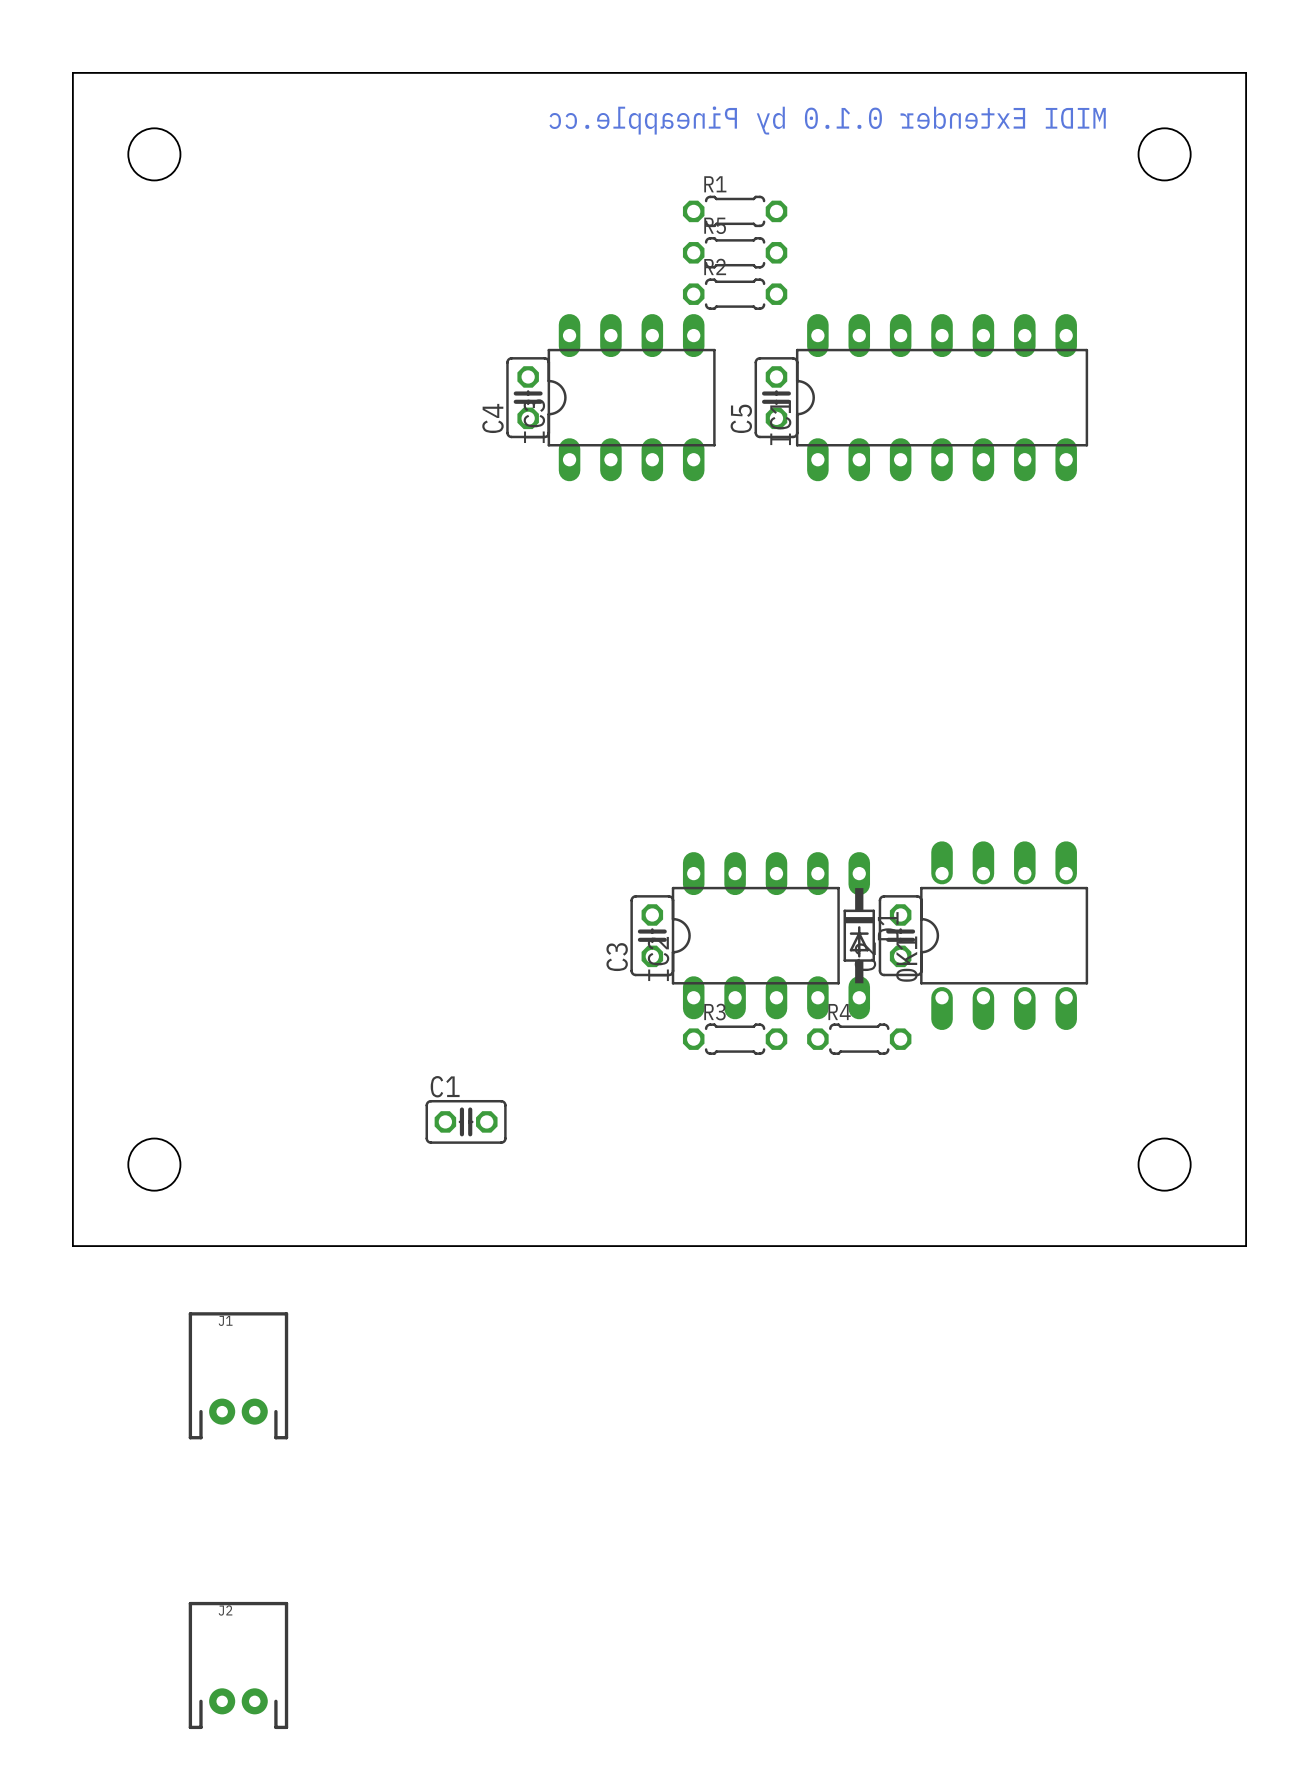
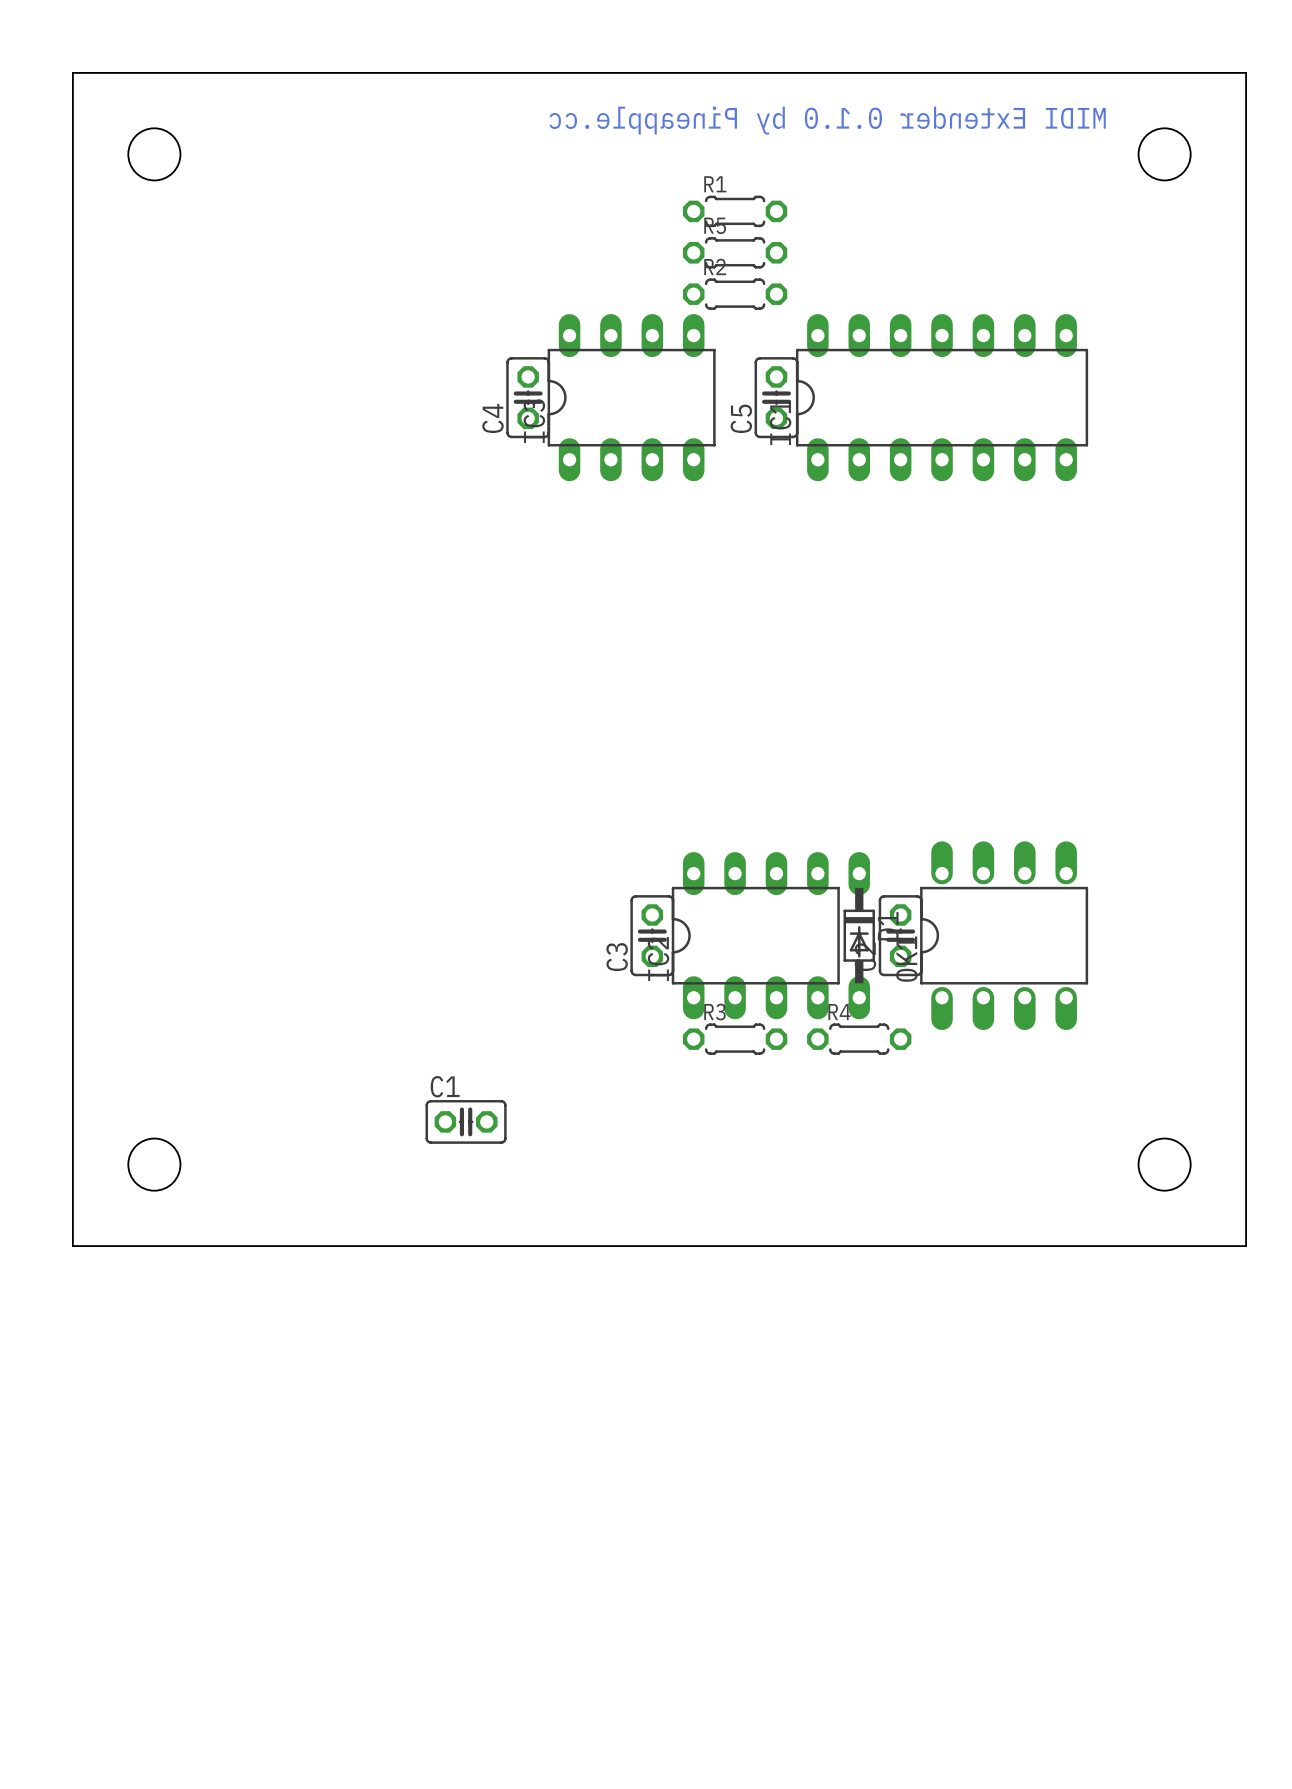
J1: (238, 1375) -> none
J2: (238, 1665) -> none

